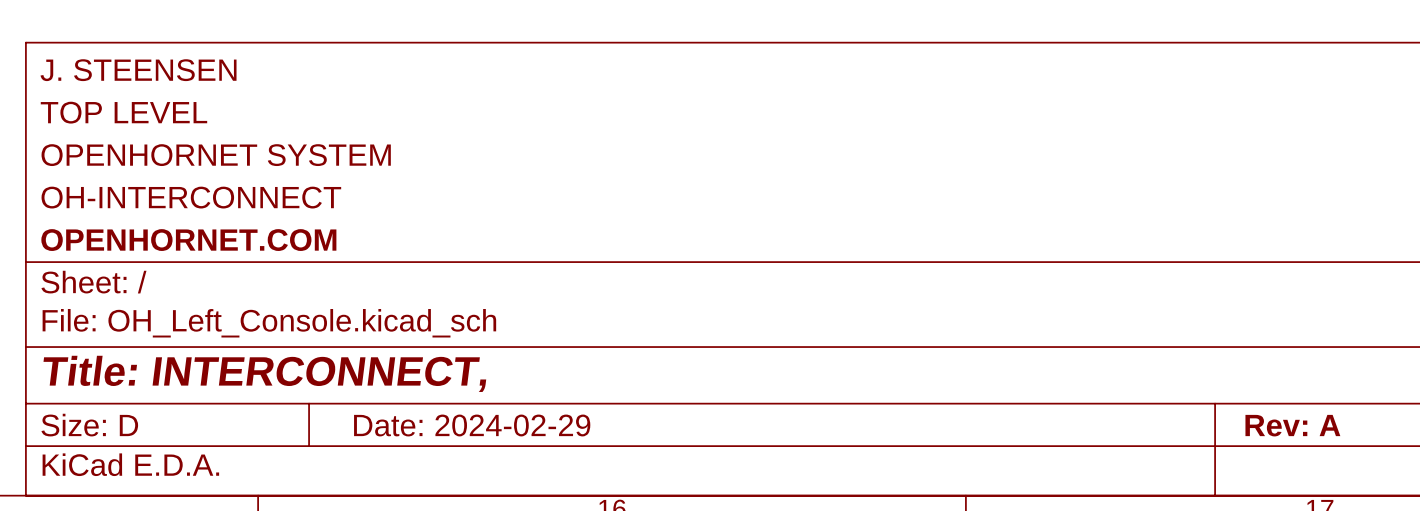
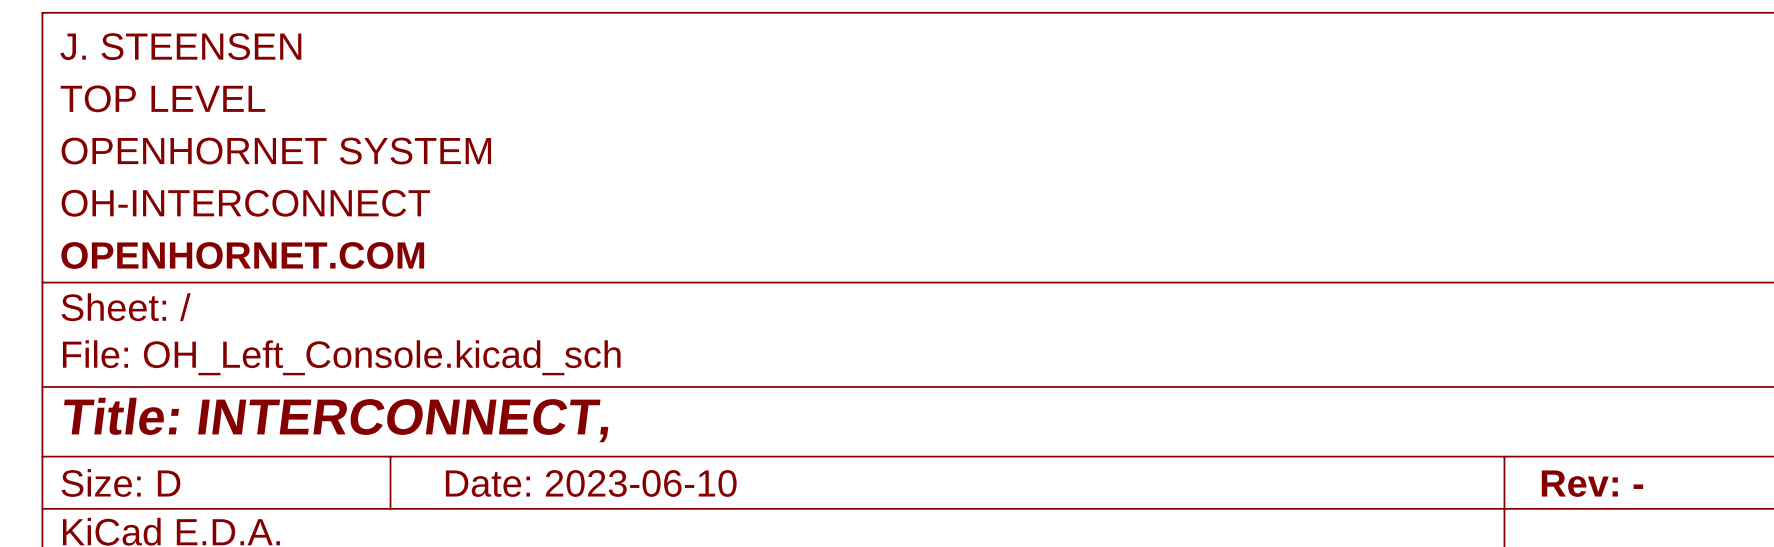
title block: Date: 2024-02-29 (472, 425) -> Date: 2023-06-10 (591, 483)
title block: Rev: A (1292, 425) -> Rev: - (1592, 483)

